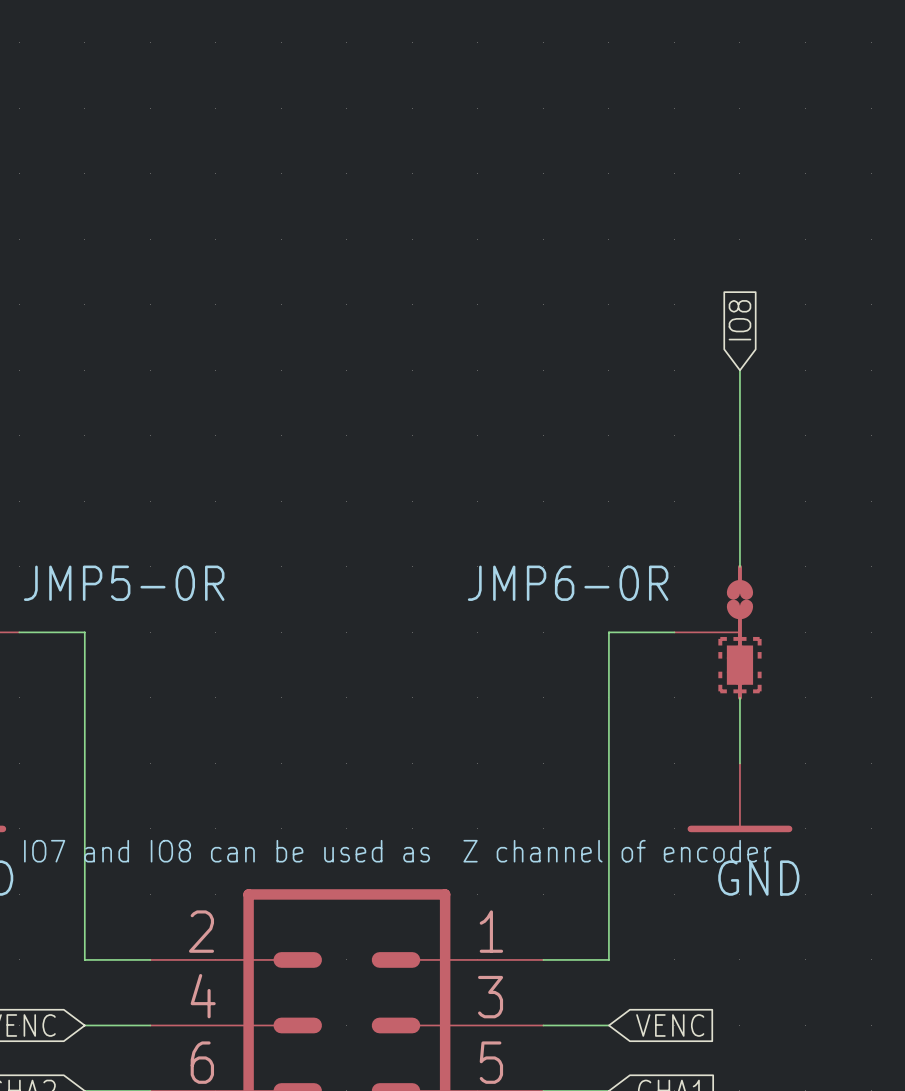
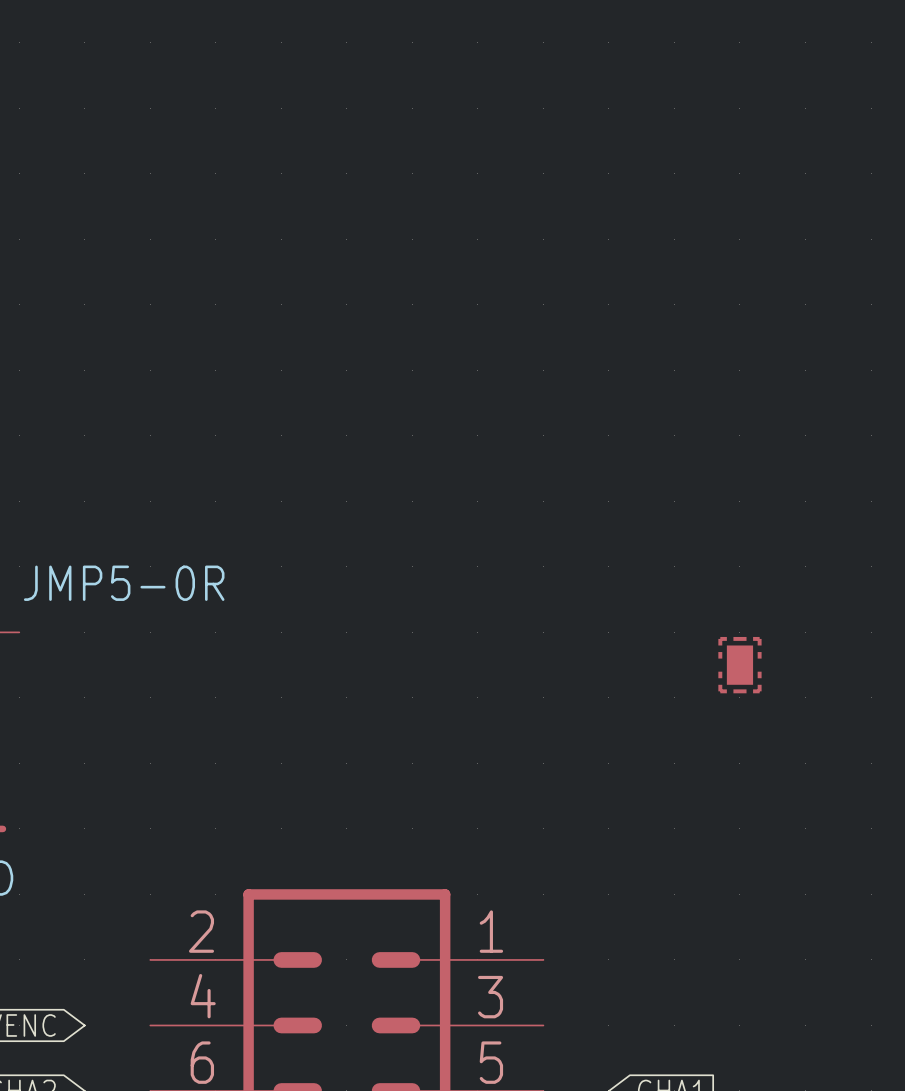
global label: IO8 (739, 320) -> none
wire: (739, 370) (739, 566) -> none
wire: (19, 632) (84, 632) (84, 959) (150, 959) -> none
wire: (674, 632) (608, 632) (608, 959) (543, 959) -> none
JMP6-0R: (713, 632) -> none
wire: (739, 697) (739, 763) -> none
power symbol: GND (739, 797) -> none
text: IO7 and IO8 can be used as Z channel of encoder (397, 851) -> none
wire: (84, 1025) (150, 1025) -> none
wire: (543, 1025) (608, 1025) -> none
global label: VENC (670, 1025) -> none
wire: (84, 1090) (150, 1090) -> none
wire: (543, 1090) (608, 1090) -> none

